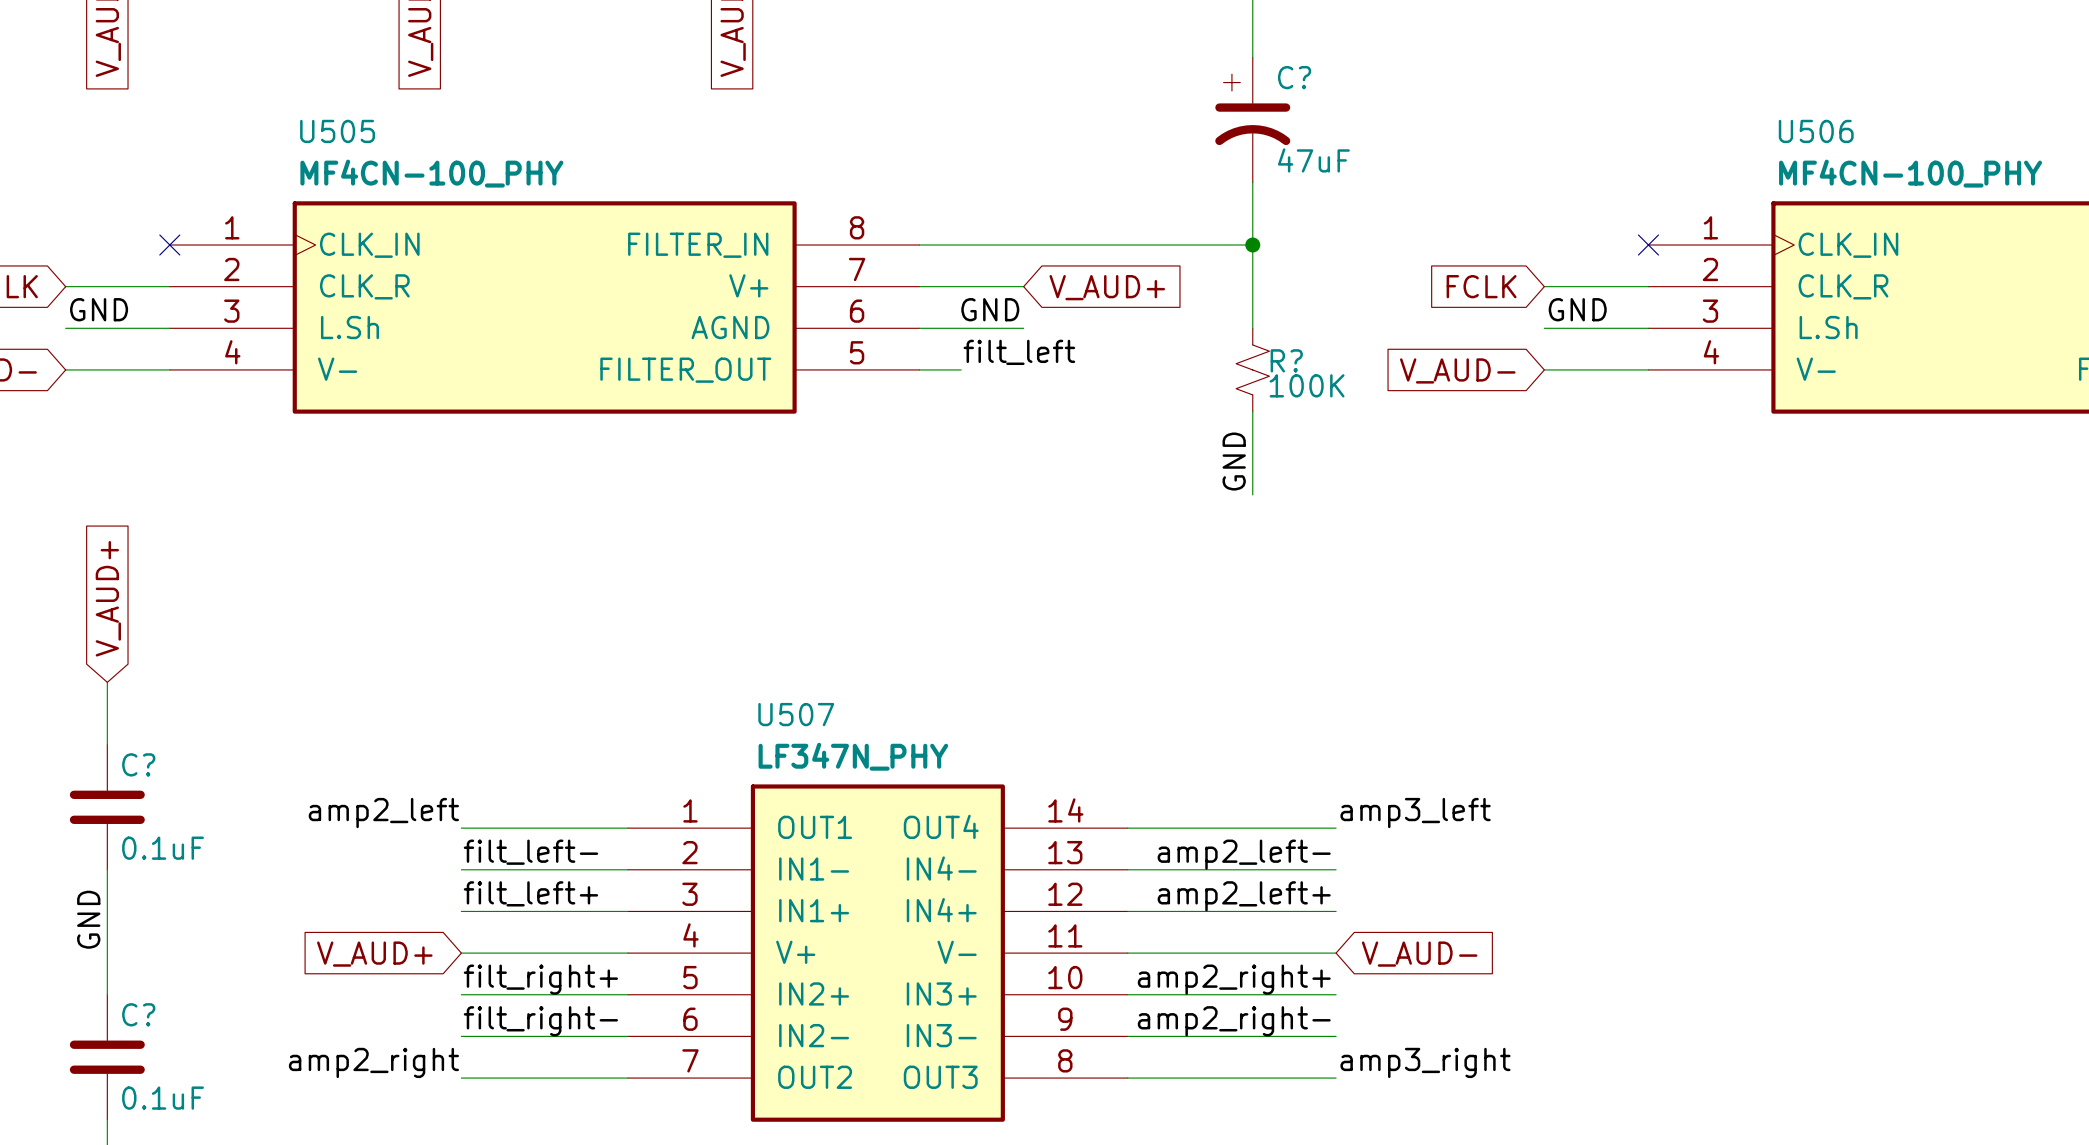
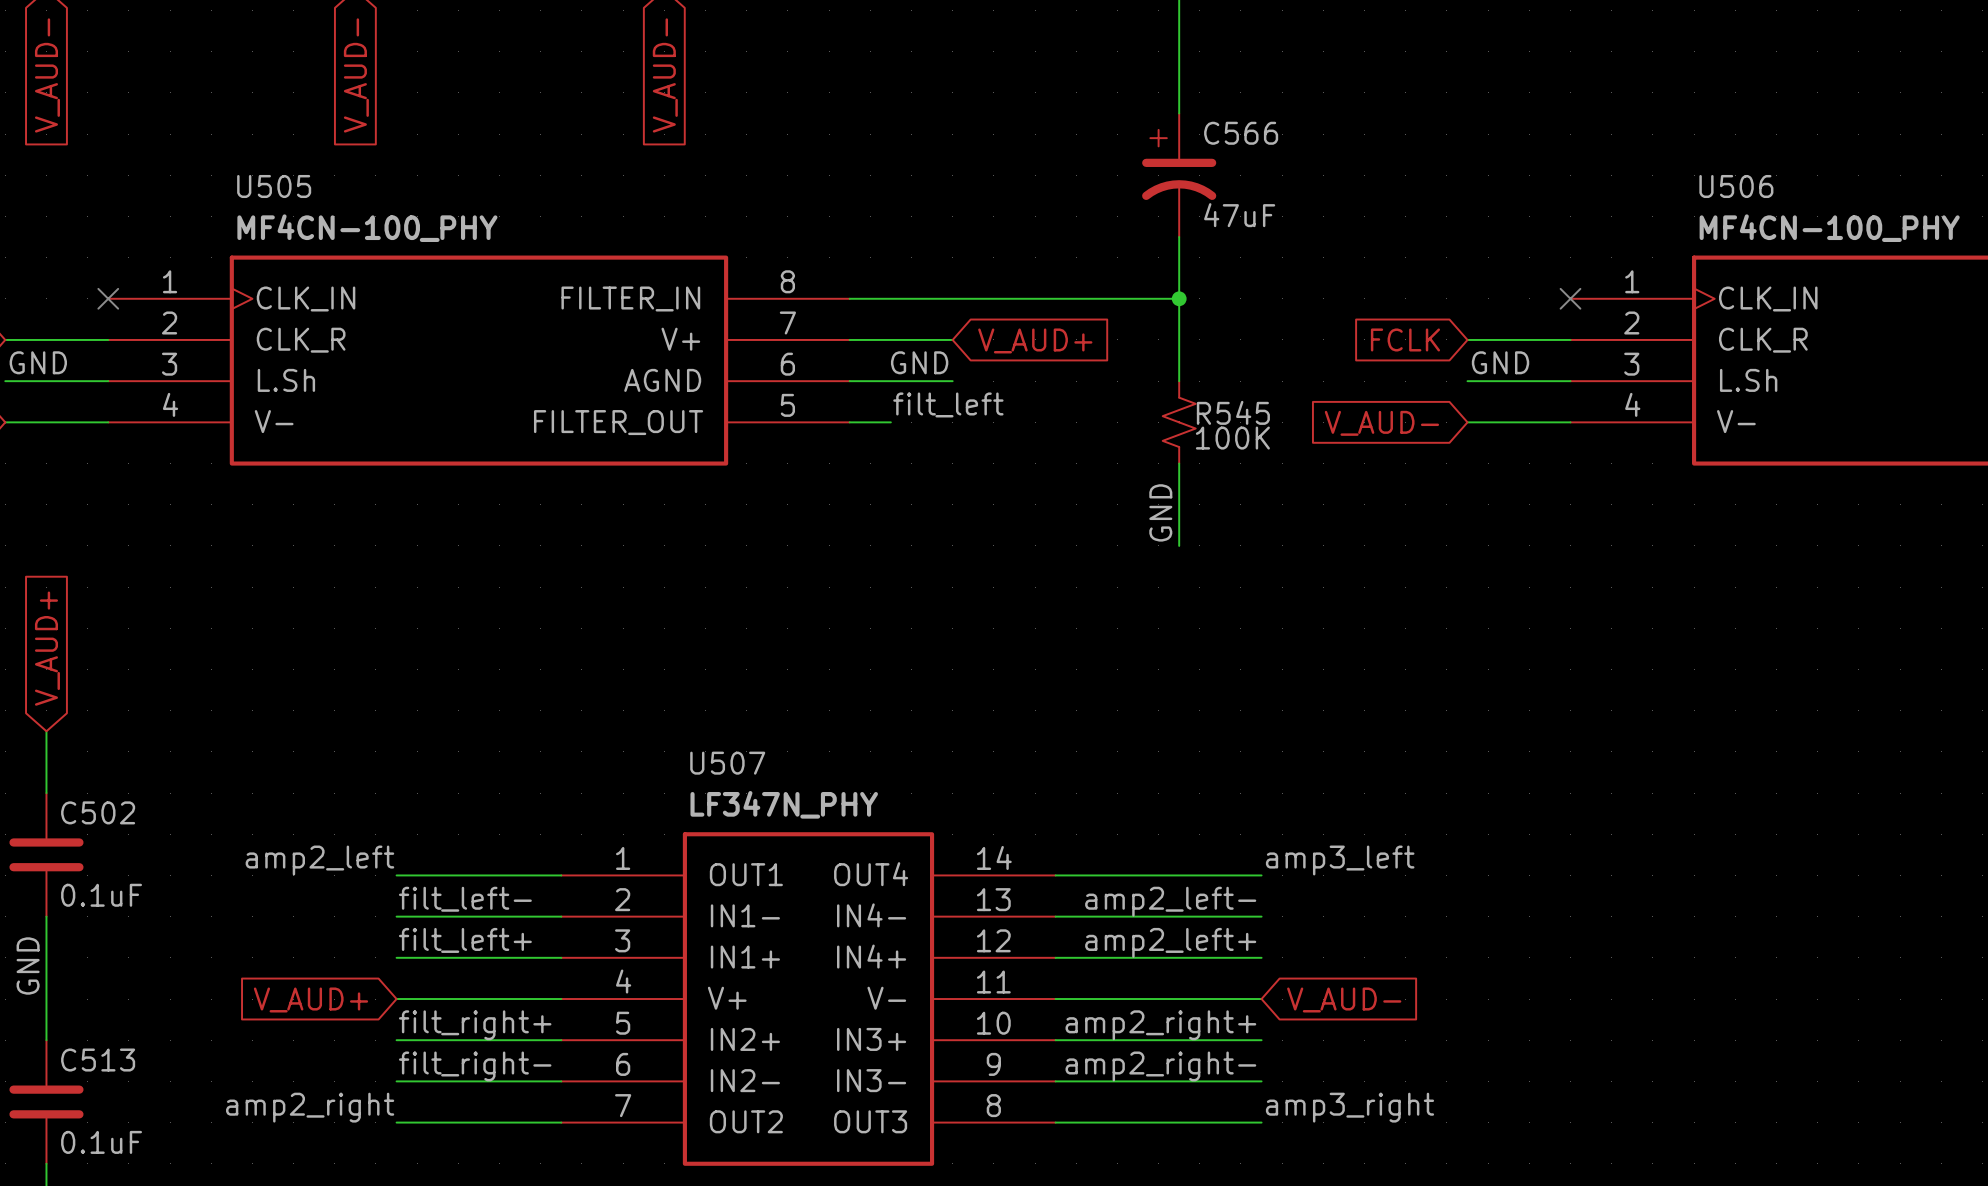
C? name: C? (1294, 77) -> C566 (1241, 133)
R? name: R? (1286, 360) -> R545 (1233, 412)
C? name: C? (138, 764) -> C502 (98, 812)
C? name: C? (138, 1014) -> C513 (98, 1060)

